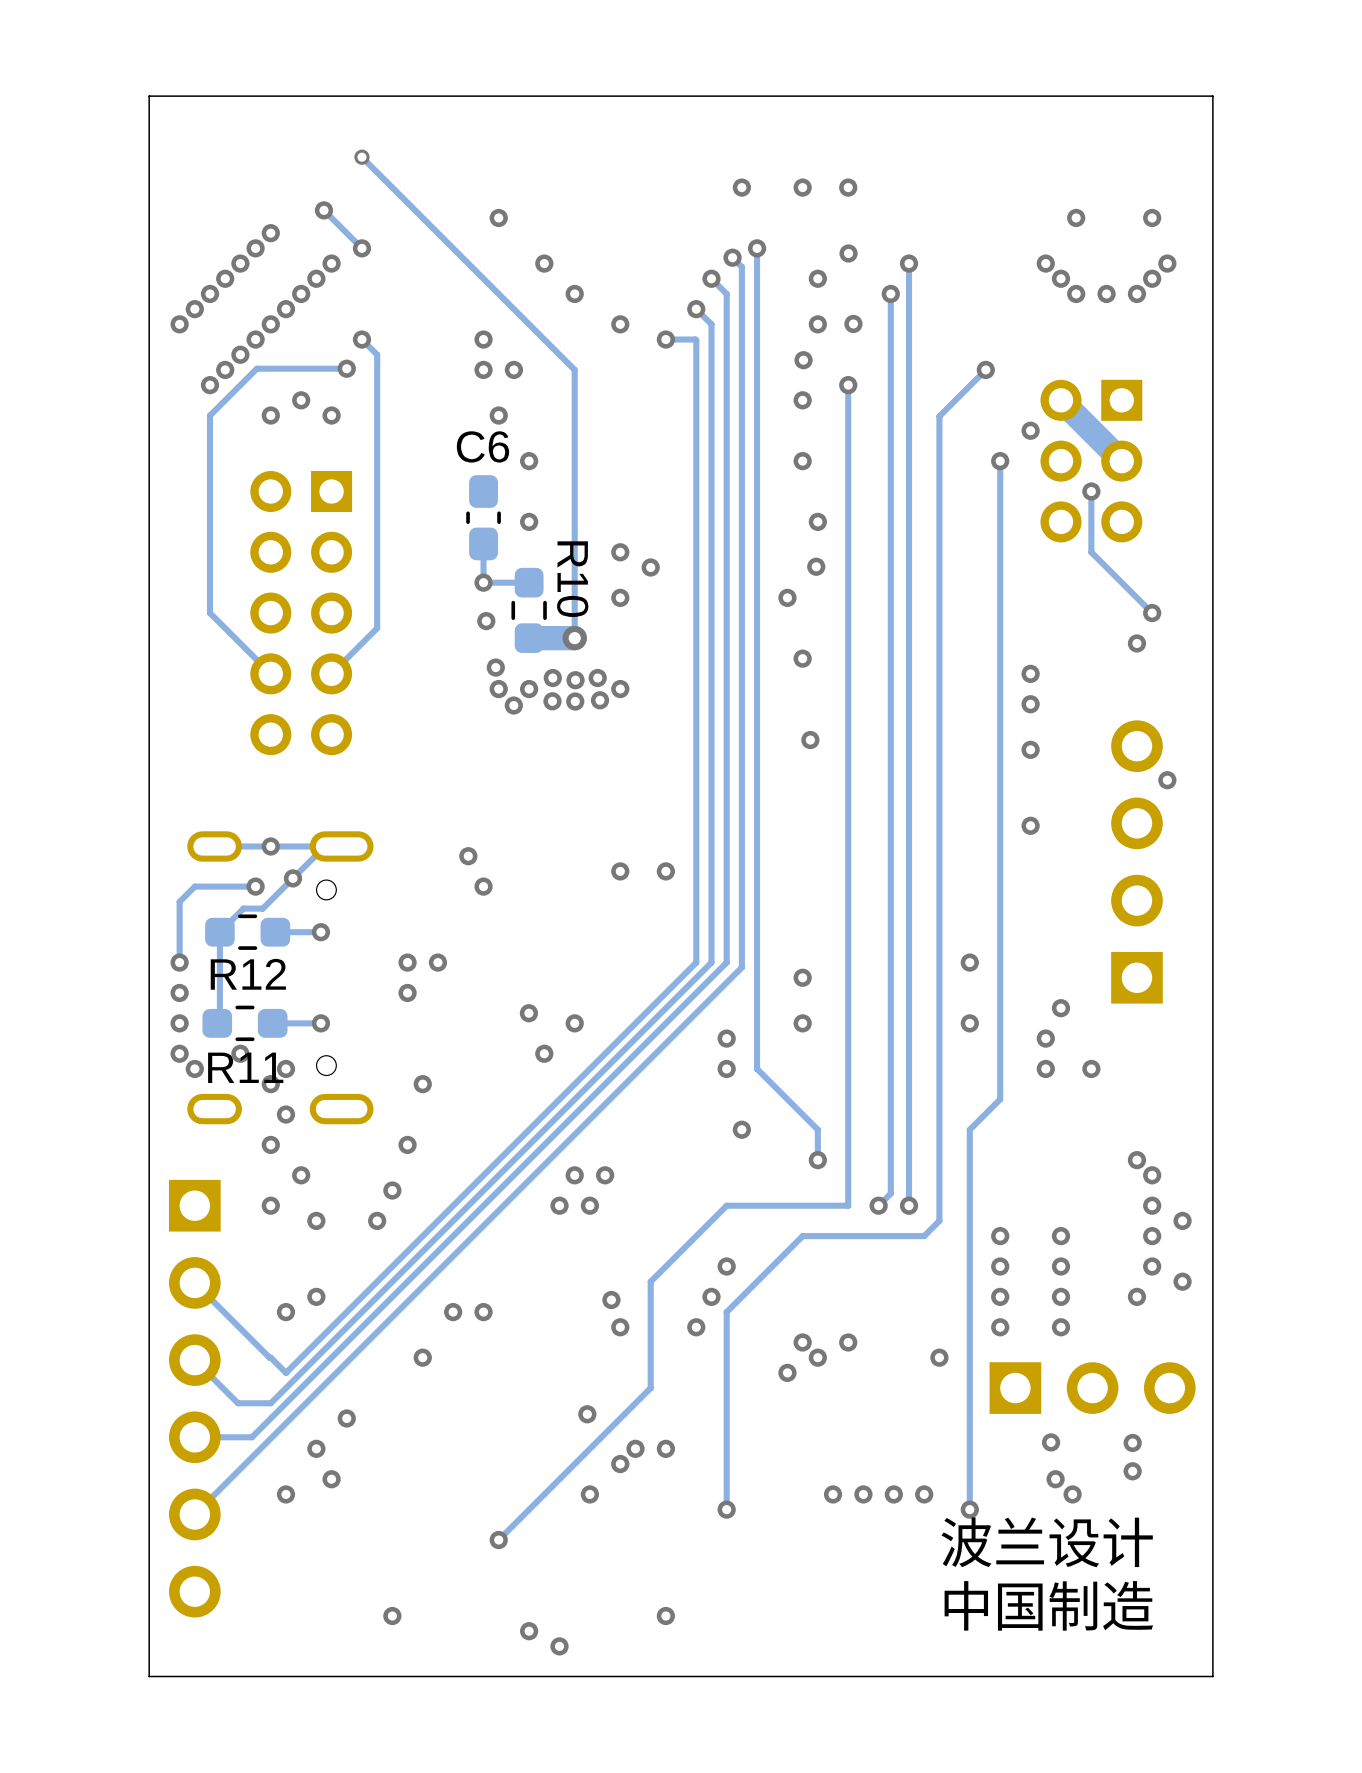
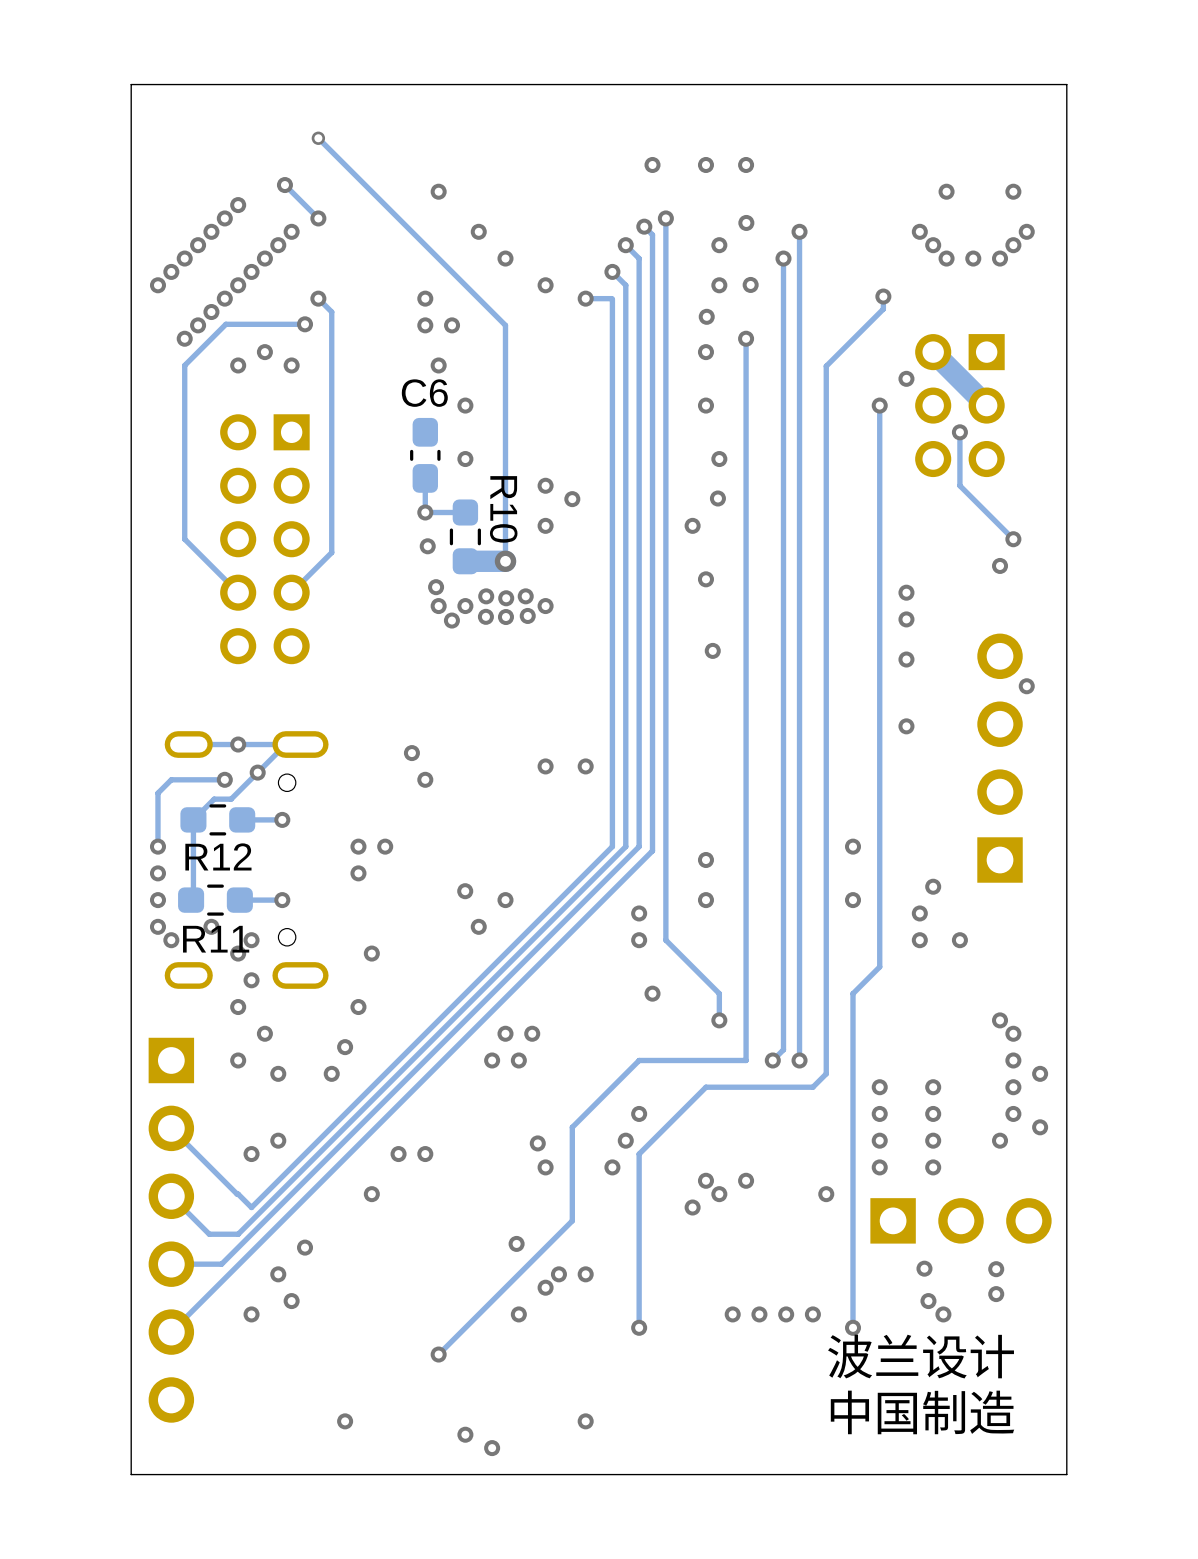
track: none -> (883, 296) (883, 309) (867, 325)
via position: (985, 369) -> (883, 296)

